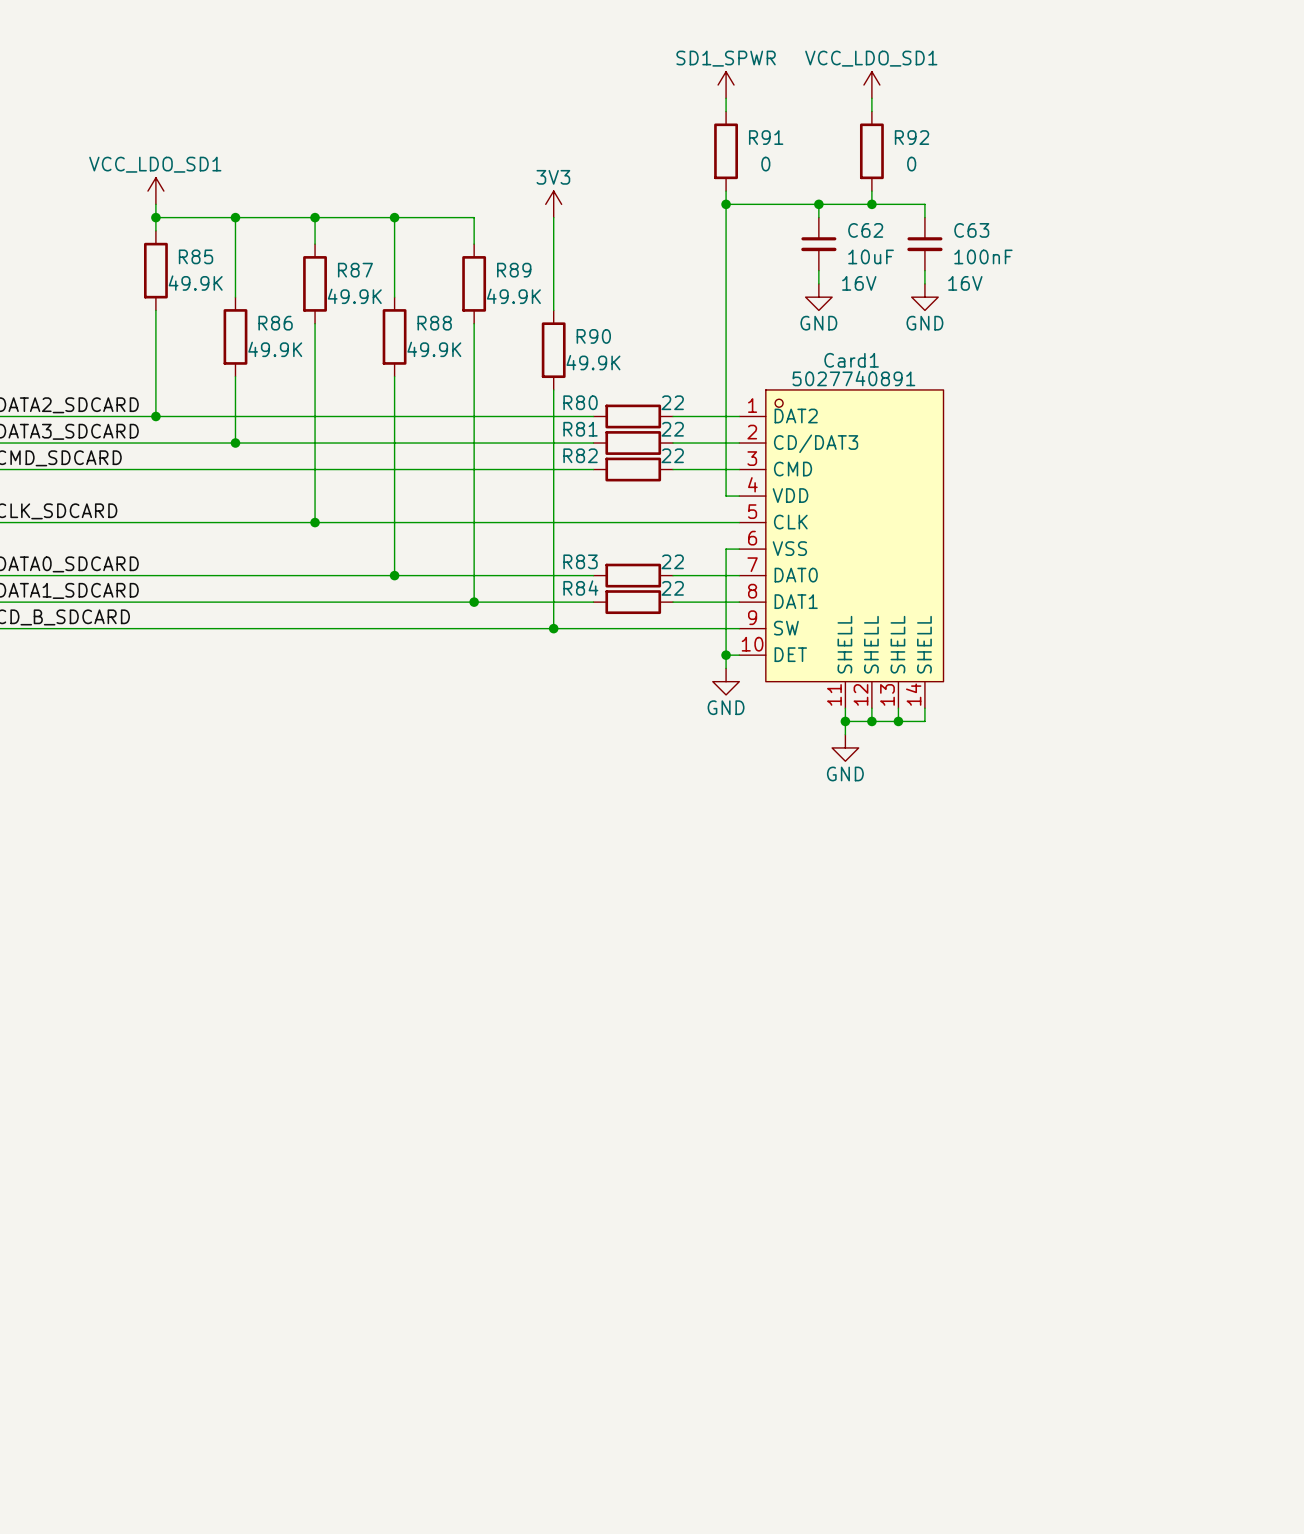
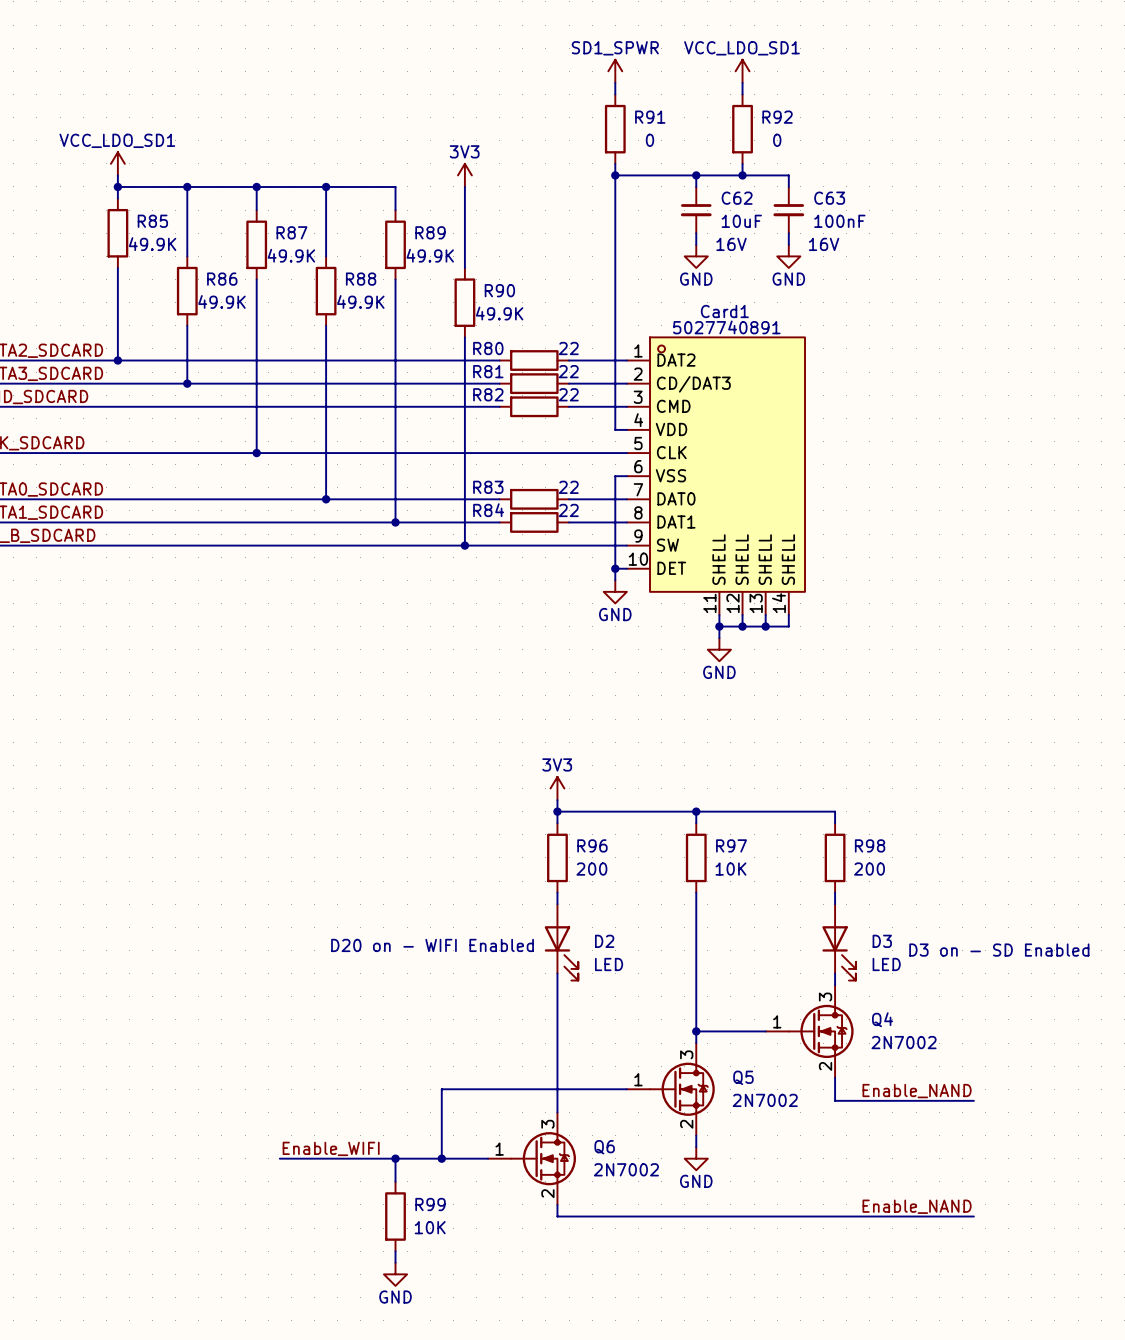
power symbol: none -> 3V3 (557, 788)
wire: none -> (557, 800) (557, 823)
wire: none -> (557, 811) (835, 811) (835, 823)
junction: none -> (557, 811)
wire: none -> (696, 811) (696, 823)
junction: none -> (696, 811)
R96: none -> 200 (557, 857)
R97: none -> 10K (696, 857)
R98: none -> 200 (835, 857)
wire: none -> (557, 892) (557, 904)
wire: none -> (696, 892) (696, 1043)
wire: none -> (835, 892) (835, 904)
D2: none -> LED (561, 942)
D3: none -> LED (839, 942)
text: none -> D20 on - WIFI Enabled (432, 945)
text: none -> D3 on - SD Enabled (999, 950)
wire: none -> (557, 973) (557, 1112)
wire: none -> (835, 973) (835, 985)
wire: none -> (696, 1031) (765, 1031)
junction: none -> (696, 1031)
Q4: none -> 2N7002 (809, 1031)
wire: none -> (835, 1077) (835, 1100) (973, 1100)
wire: none -> (626, 1089) (441, 1089) (441, 1158)
Q5: none -> 2N7002 (670, 1089)
label: none -> Enable_NAND (917, 1091)
wire: none -> (696, 1135) (696, 1147)
label: none -> Enable_WIFI (331, 1148)
wire: none -> (279, 1158) (488, 1158)
wire: none -> (395, 1158) (395, 1181)
junction: none -> (395, 1158)
junction: none -> (441, 1158)
Q6: none -> 2N7002 (532, 1158)
power symbol: none -> GND (696, 1158)
wire: none -> (557, 1204) (557, 1216) (973, 1216)
label: none -> Enable_NAND (917, 1206)
R99: none -> 10K (395, 1216)
wire: none -> (395, 1251) (395, 1262)
power symbol: none -> GND (395, 1274)

